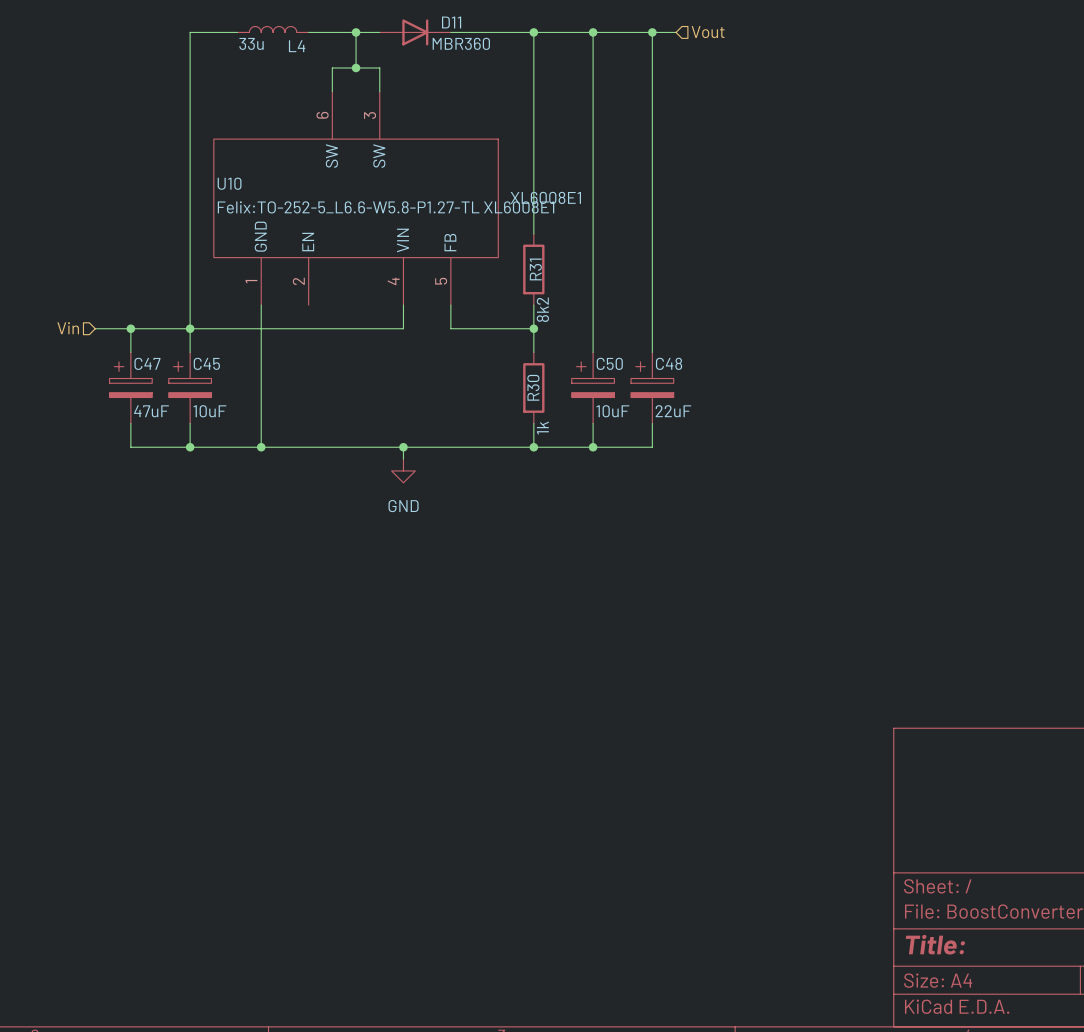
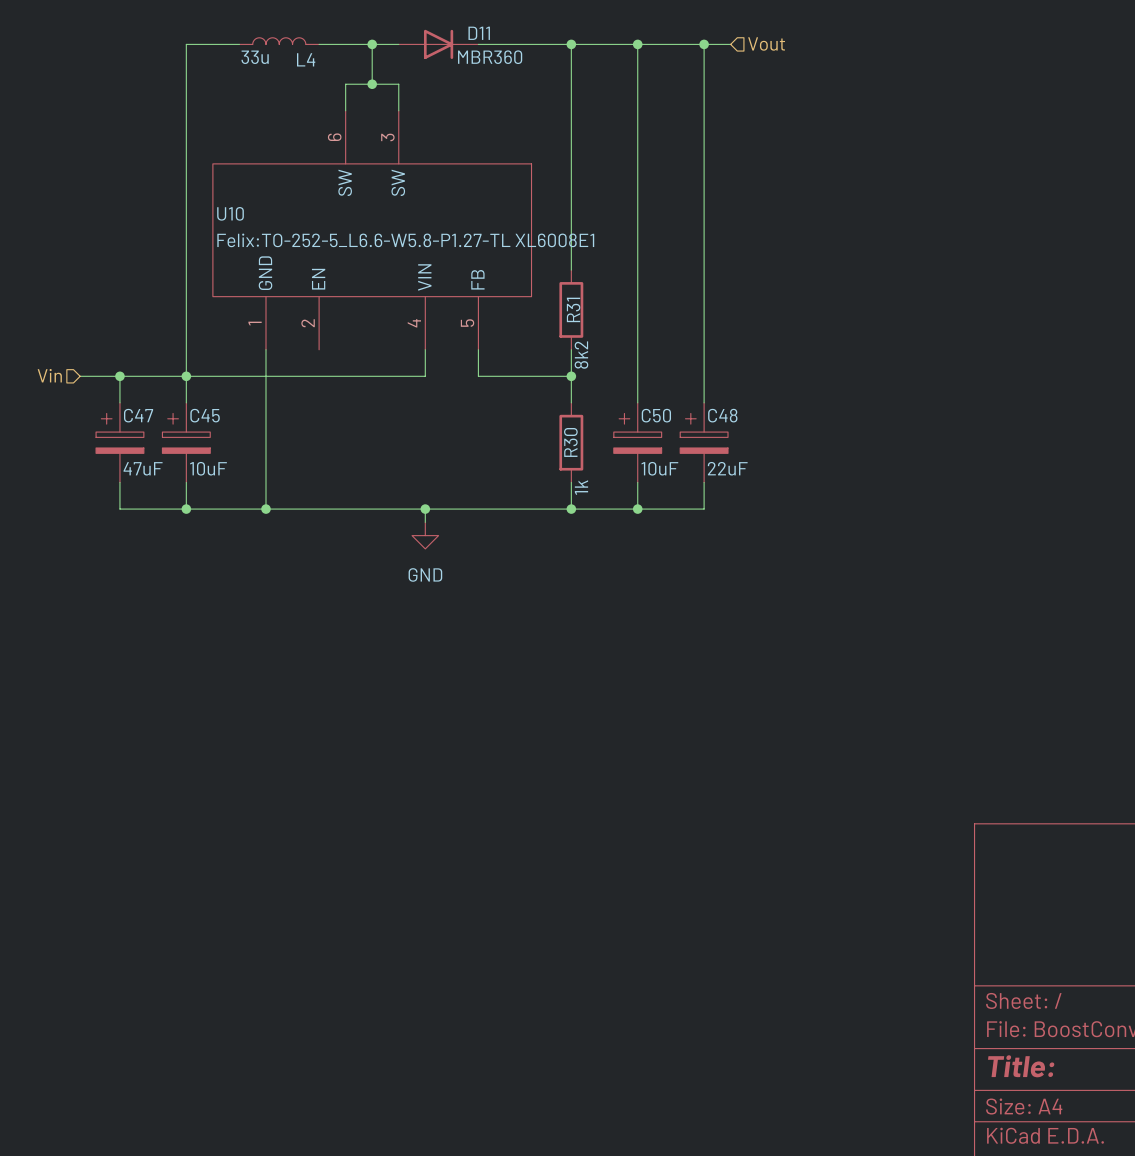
U10 value: XL6008E1 (545, 197) -> none

